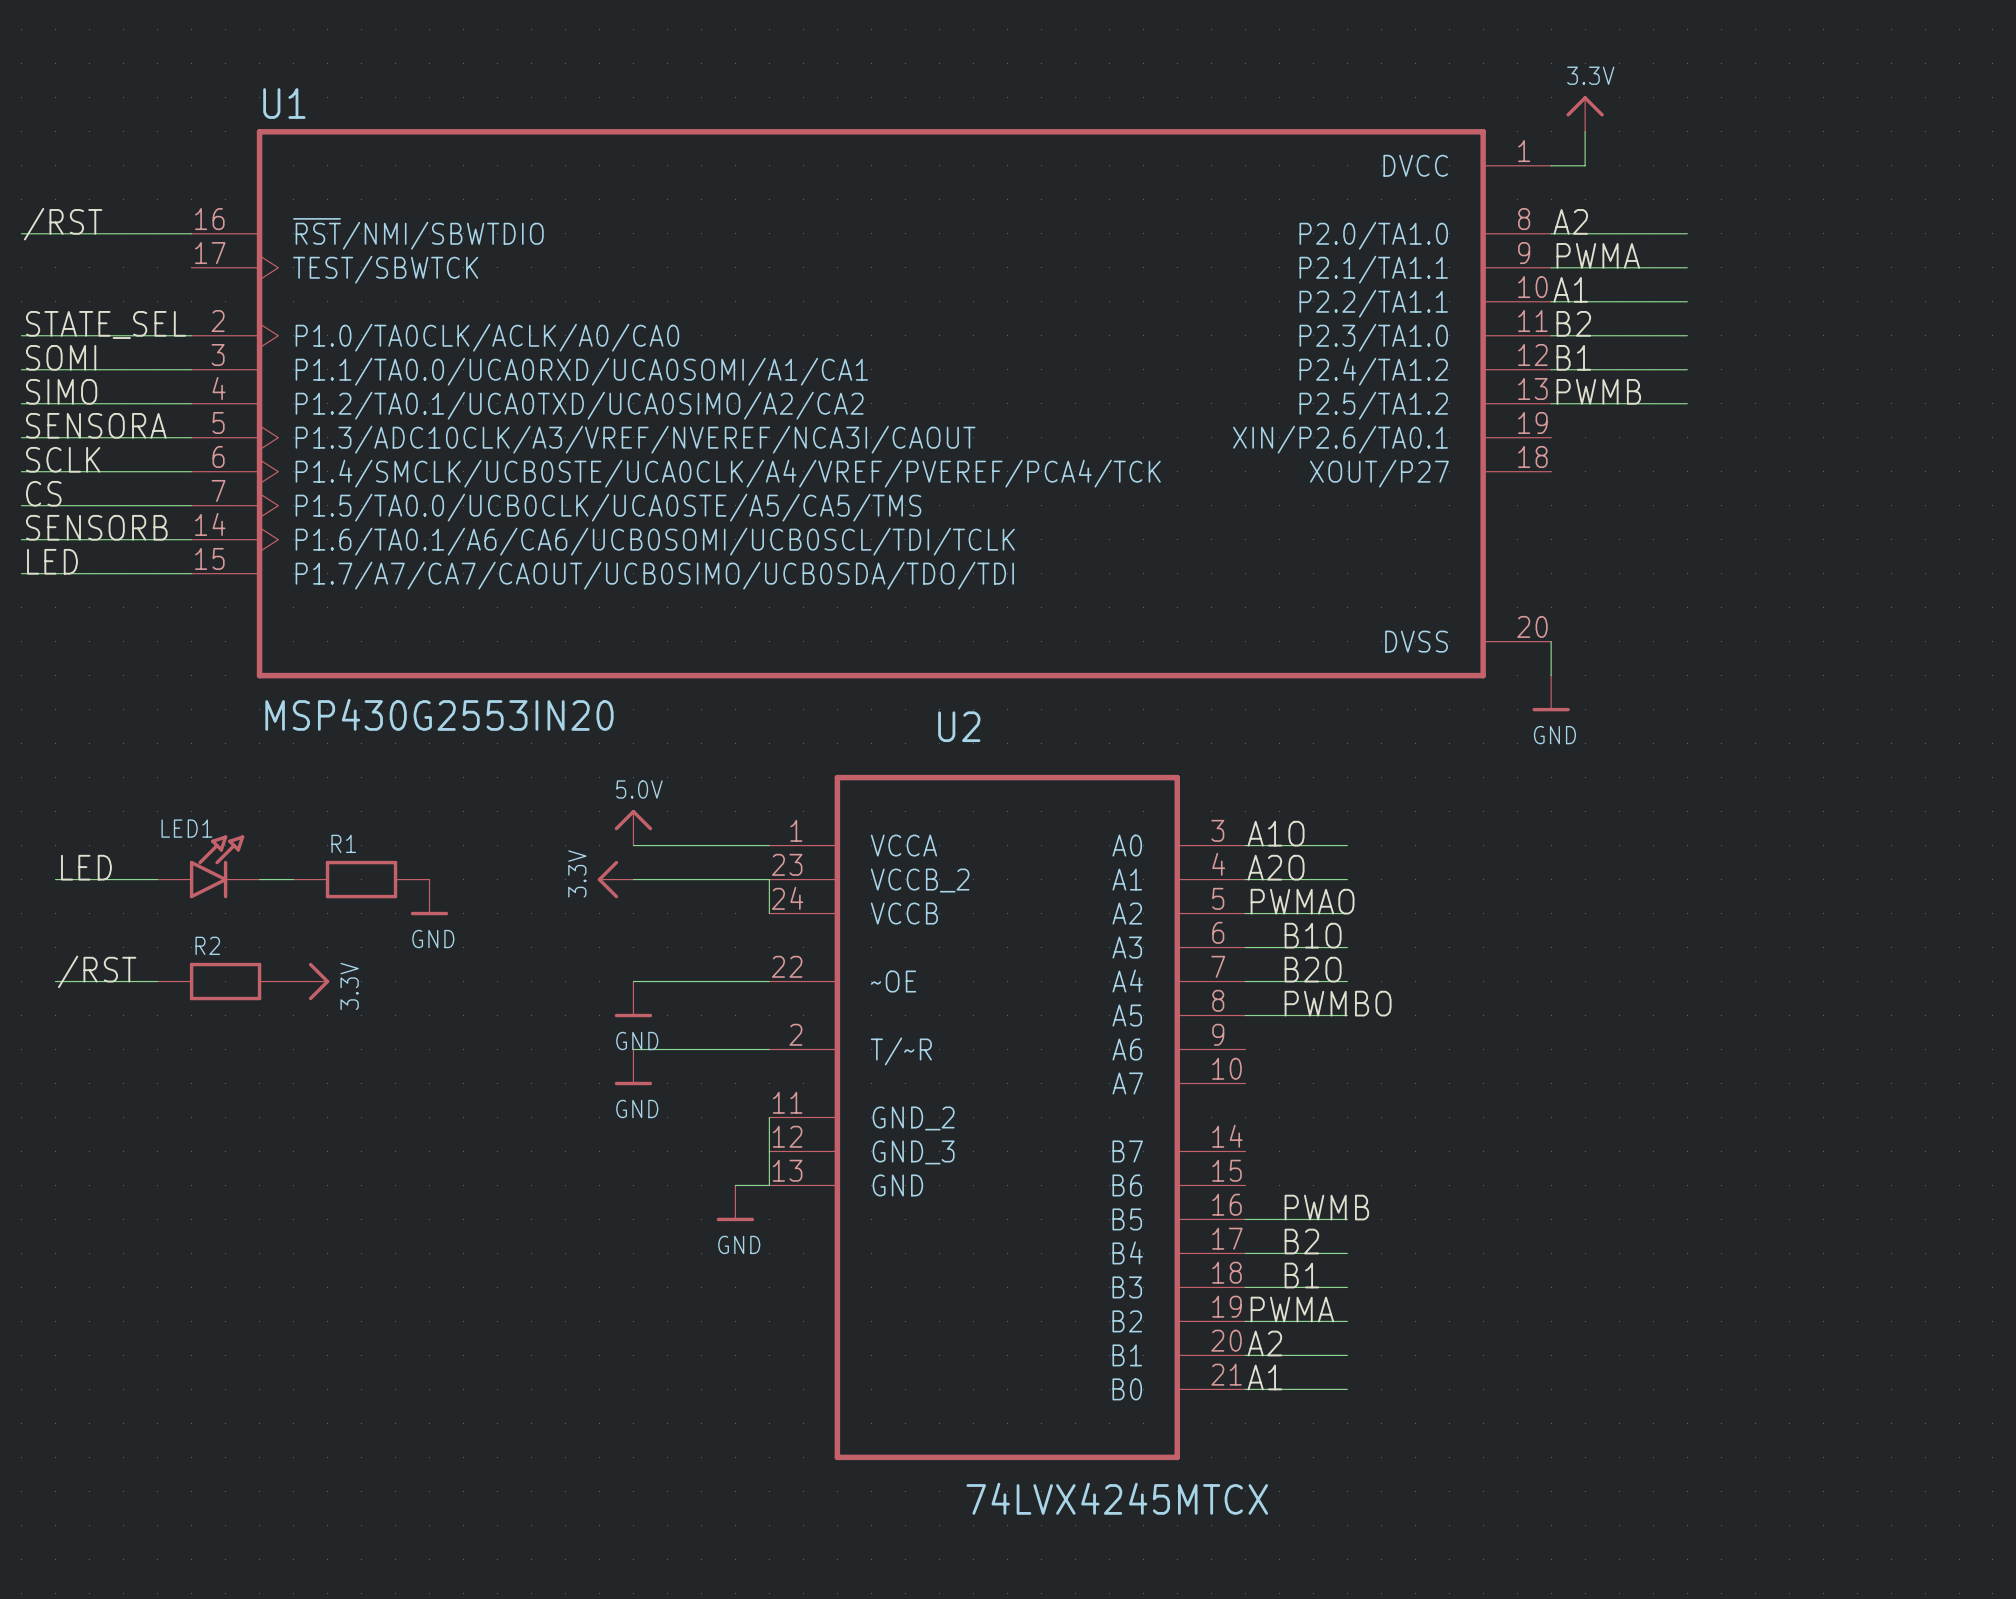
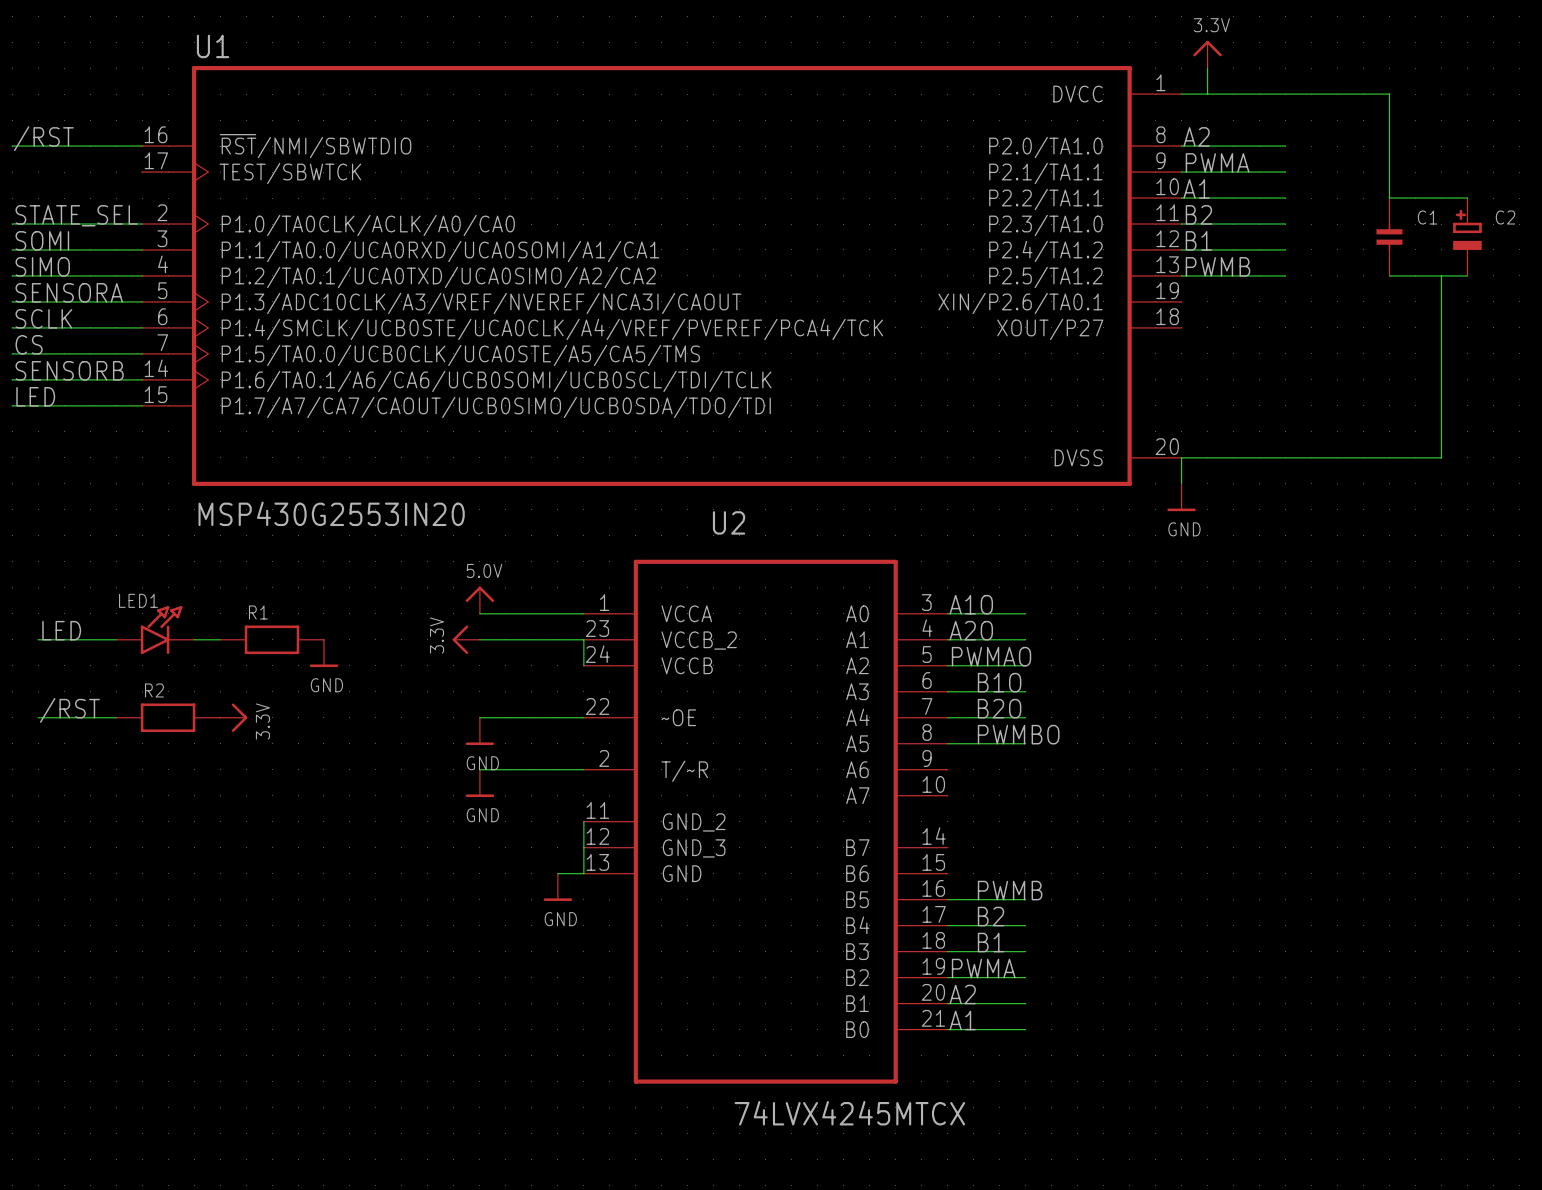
wire: none -> (1207, 94) (1389, 94) (1389, 198) (1467, 198)
C1: none -> (1389, 236)
C2: none -> (1467, 236)
wire: none -> (1389, 275) (1467, 275)
wire: none -> (1441, 275) (1441, 457) (1181, 457)

